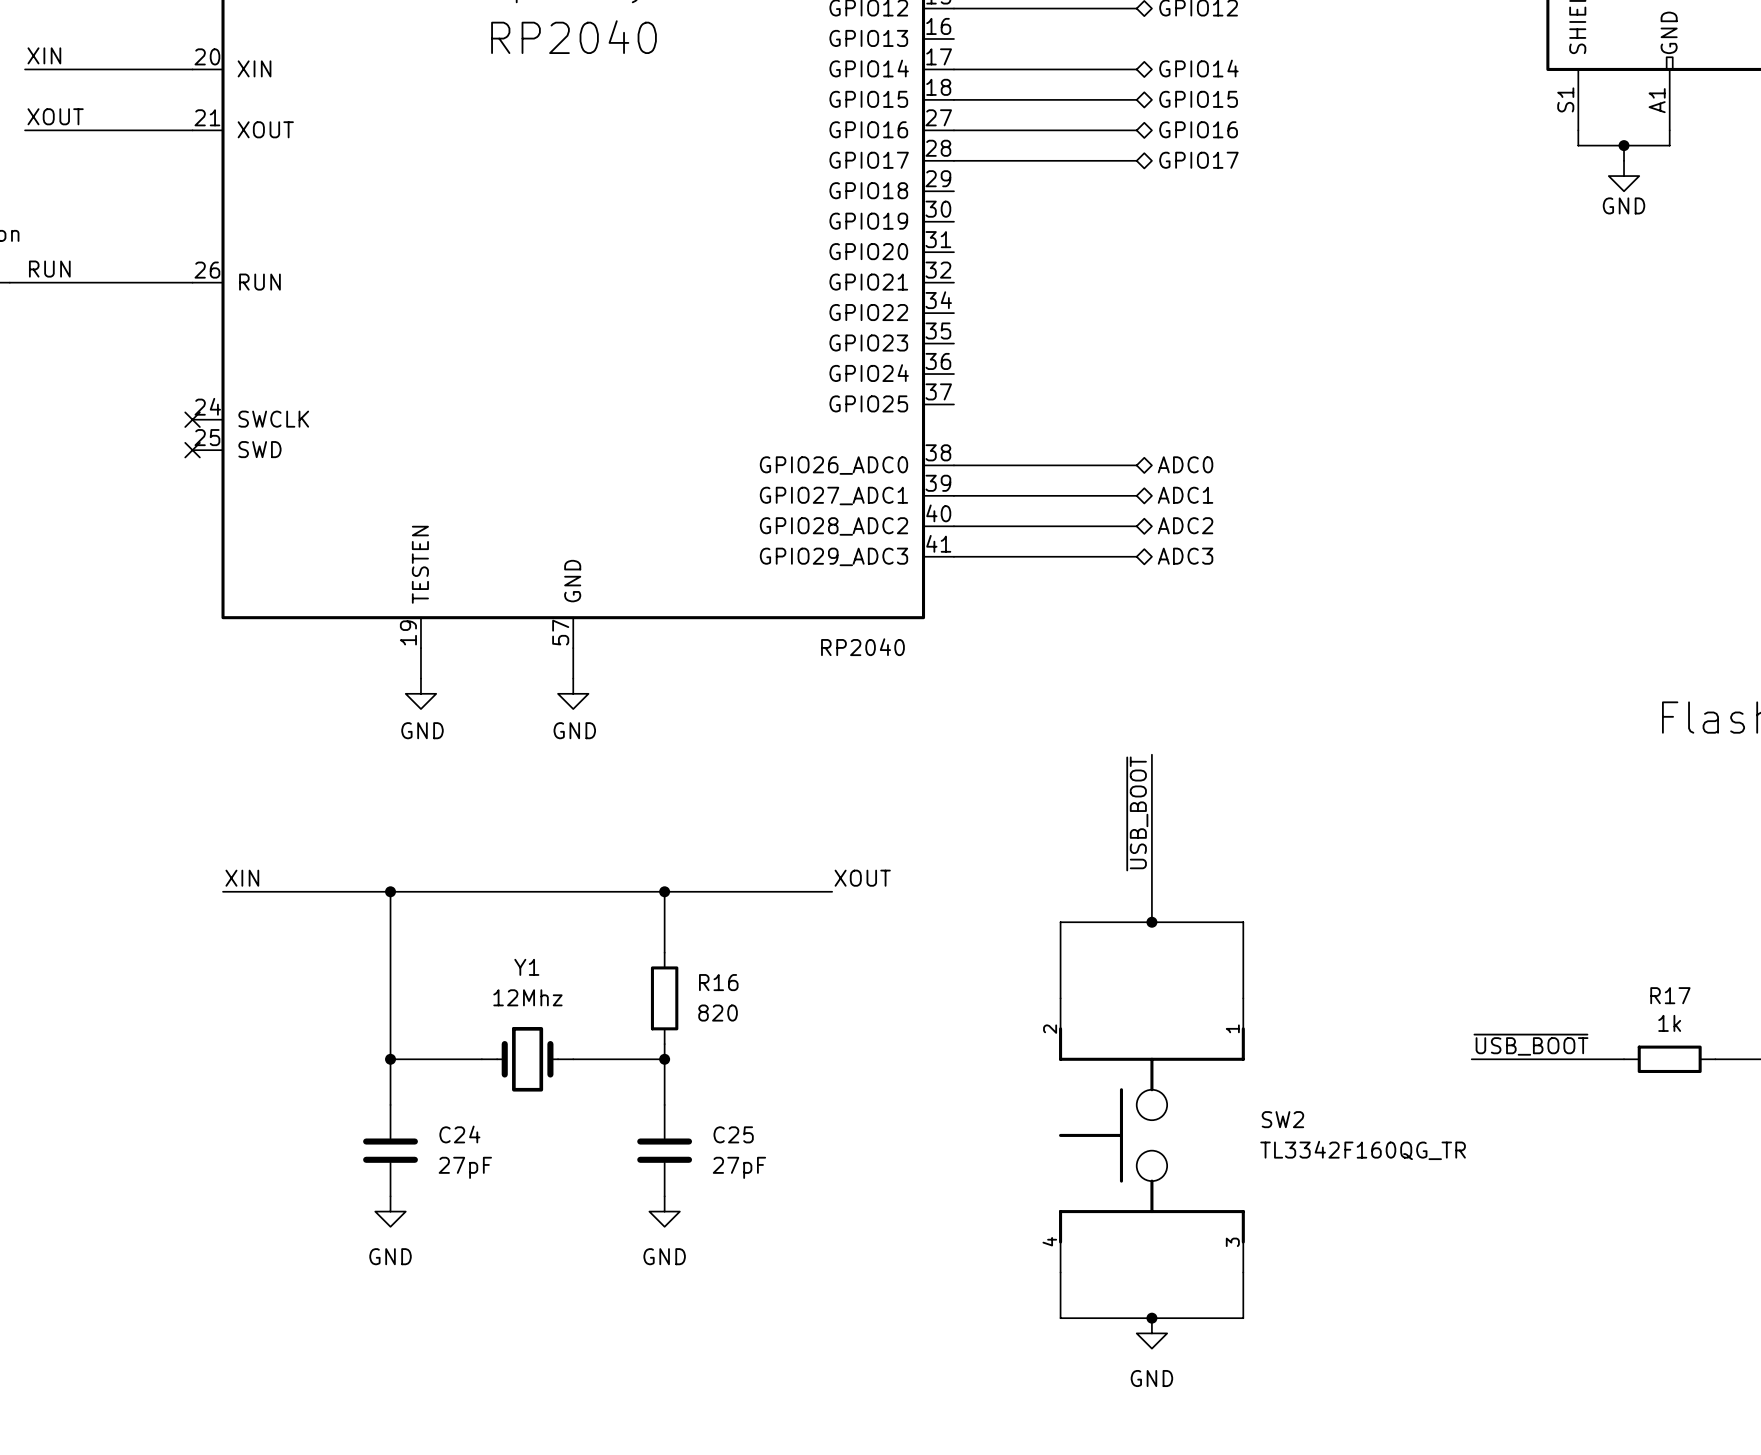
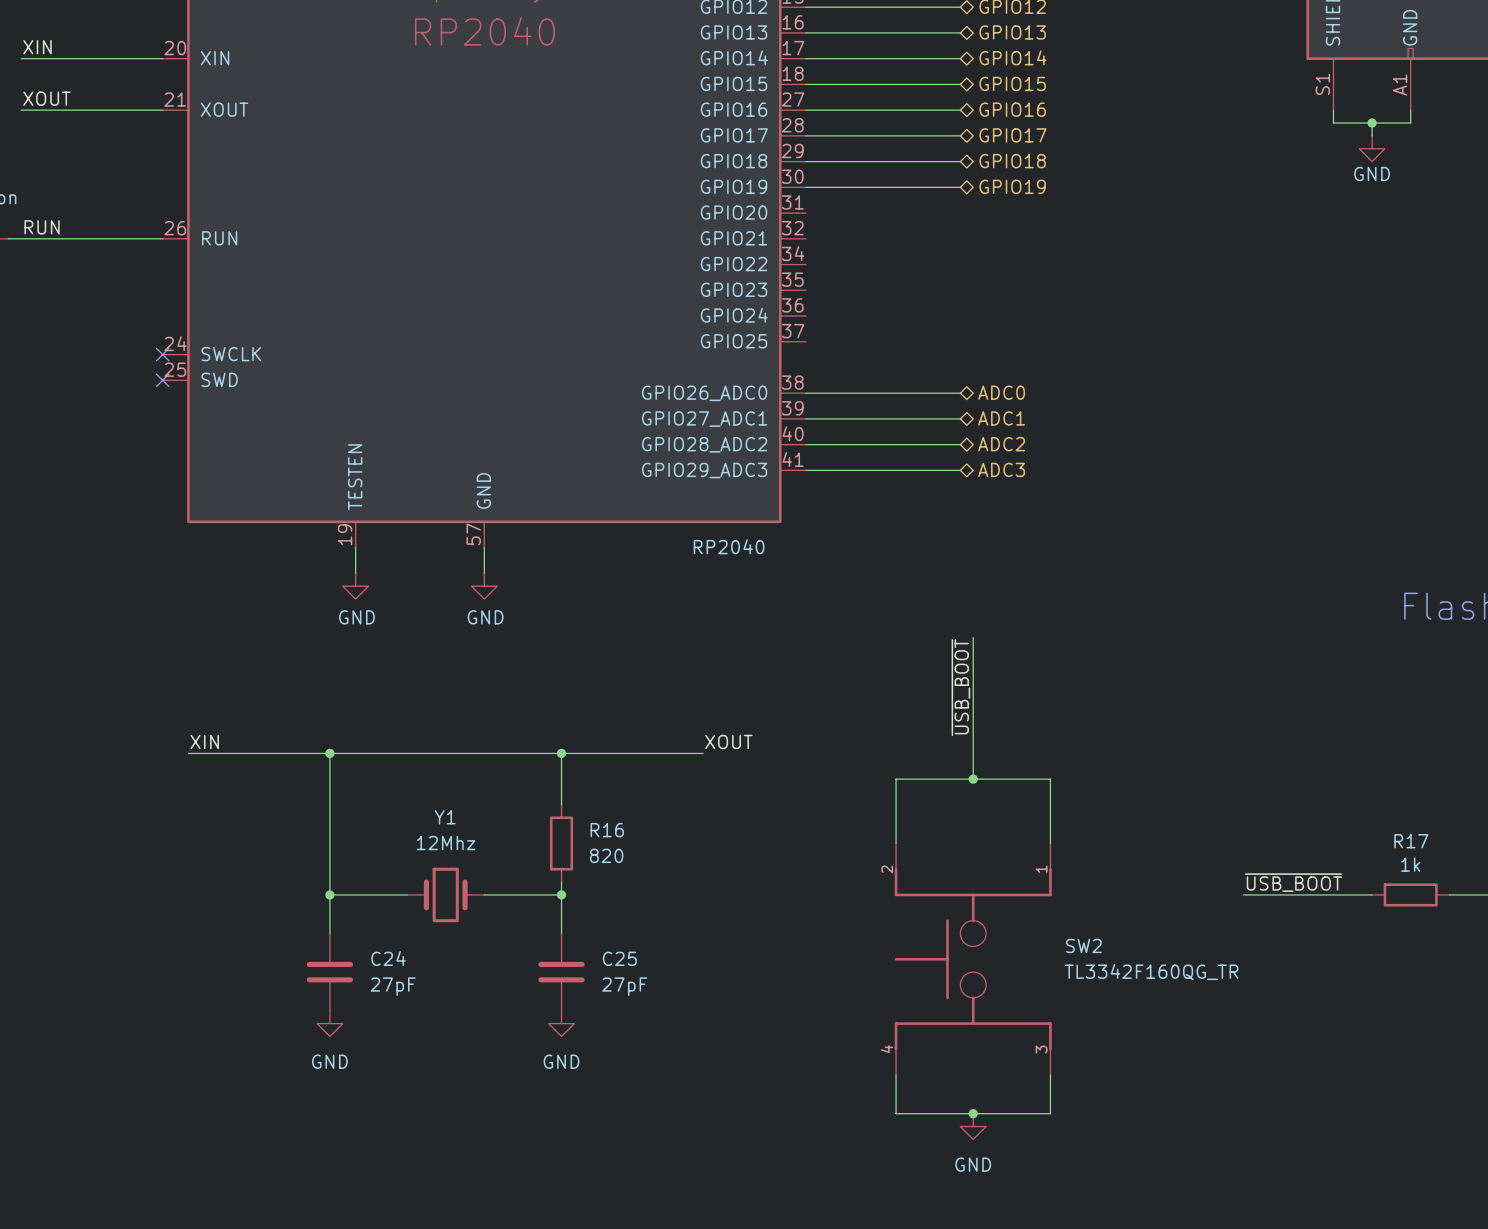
hierarchical label: none -> GPIO13 (1012, 32)
wire: none -> (805, 32) (960, 32)
hierarchical label: none -> GPIO18 (1012, 161)
wire: none -> (805, 161) (960, 161)
wire: none -> (805, 187) (960, 187)
hierarchical label: none -> GPIO19 (1012, 186)

